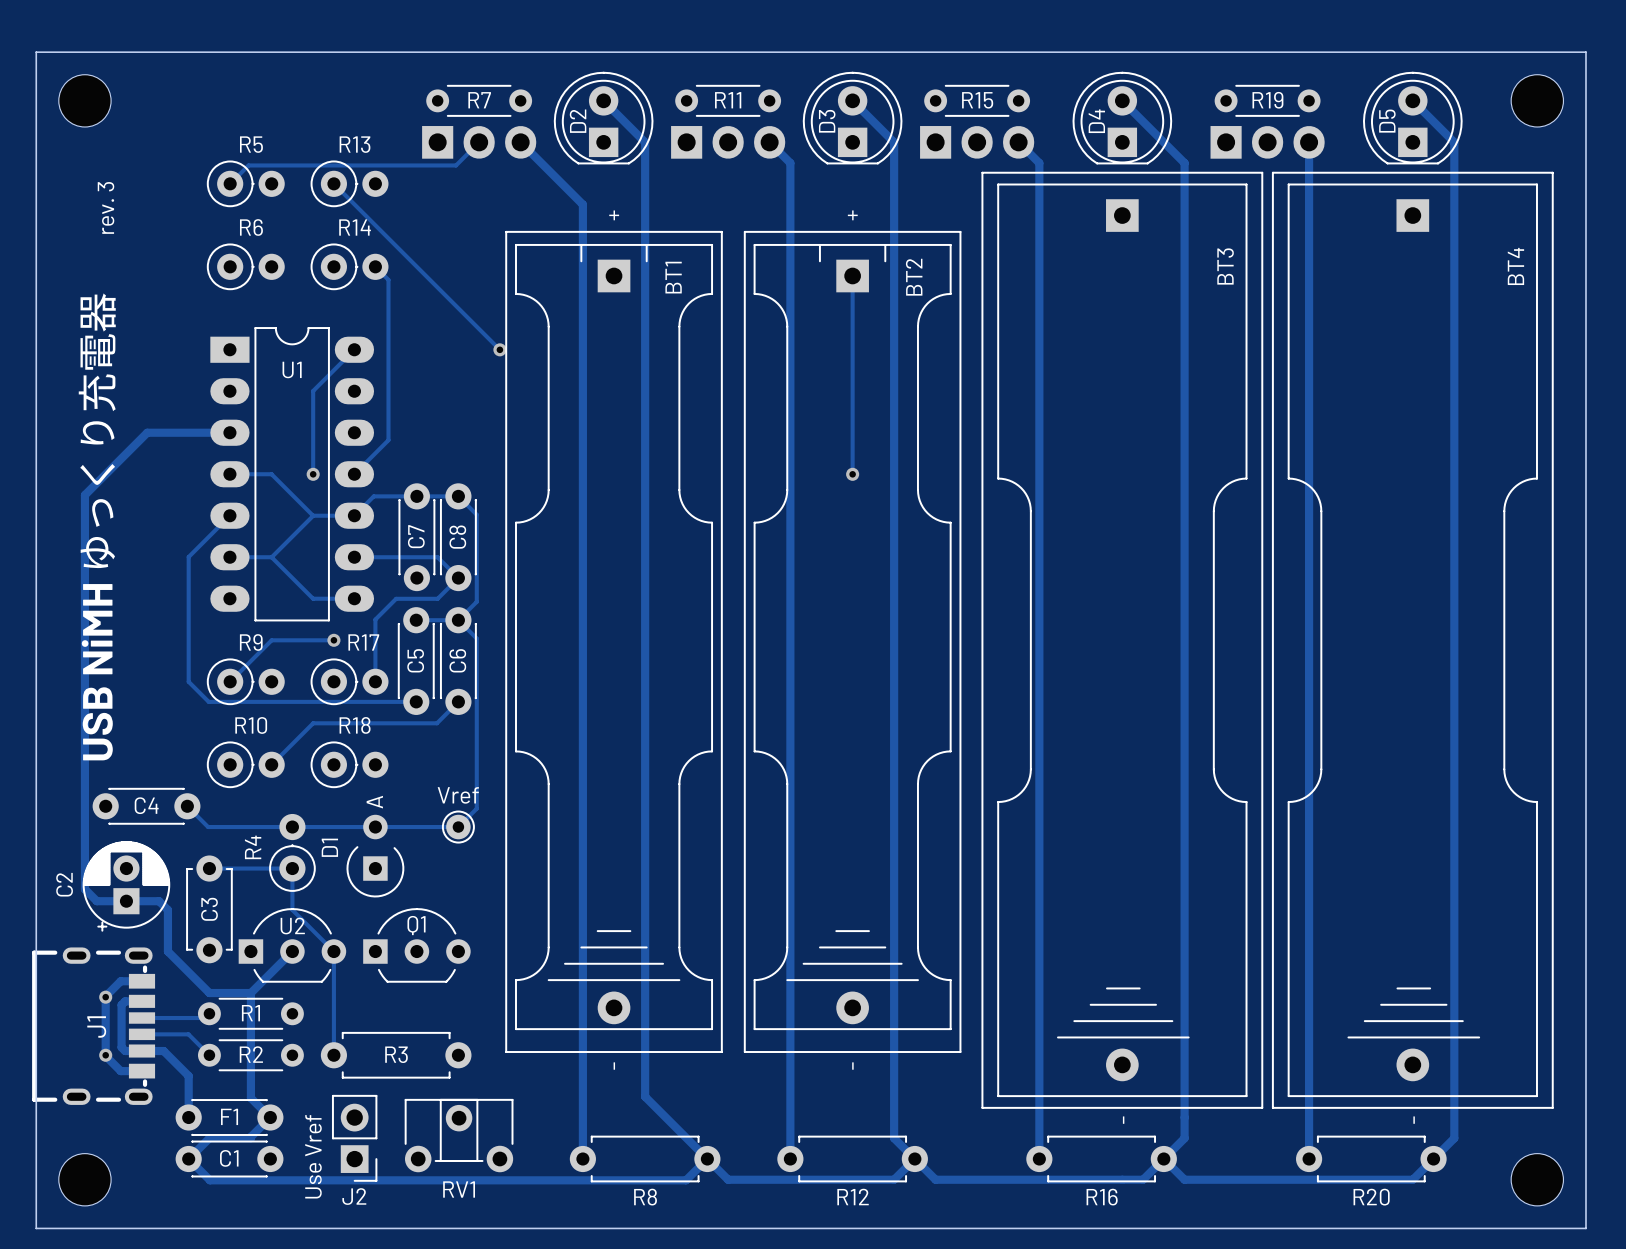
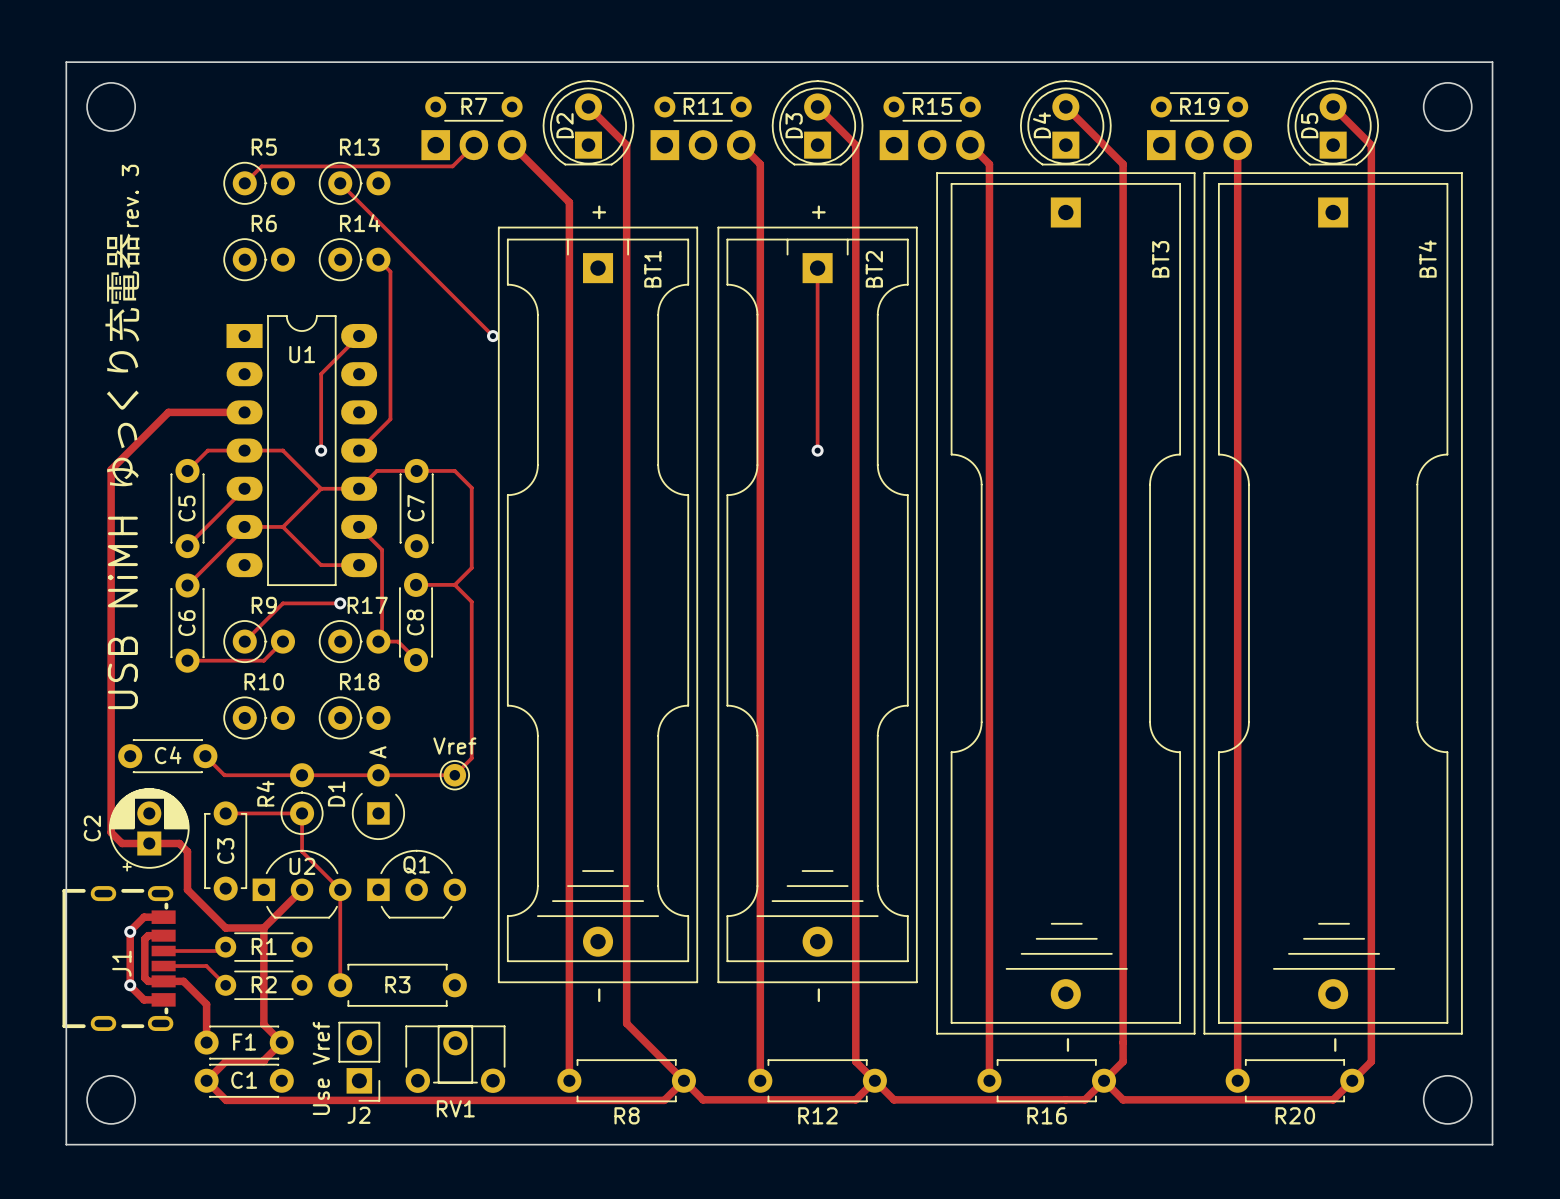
track: none -> (244, 450) (207, 450) (187, 470)
track: (229, 515) (188, 556) (188, 681) (208, 701) (416, 701) -> (244, 489) (187, 546)
C5: none -> (187, 508)
C8: (458, 537) -> none
track: none -> (244, 526) (187, 585)
track: (354, 557) (437, 557) (458, 578) (437, 598) (396, 598) (375, 619) (375, 681) -> (359, 526) (382, 549) (382, 637) (378, 641) (398, 641) (416, 660)
C5 name: C5 (415, 660) -> C8 (415, 622)
C6 position: (458, 661) -> (187, 623)
track: none -> (282, 641) (263, 660) (187, 660)
track: (458, 701) (437, 723) (313, 723) (271, 764) -> none

